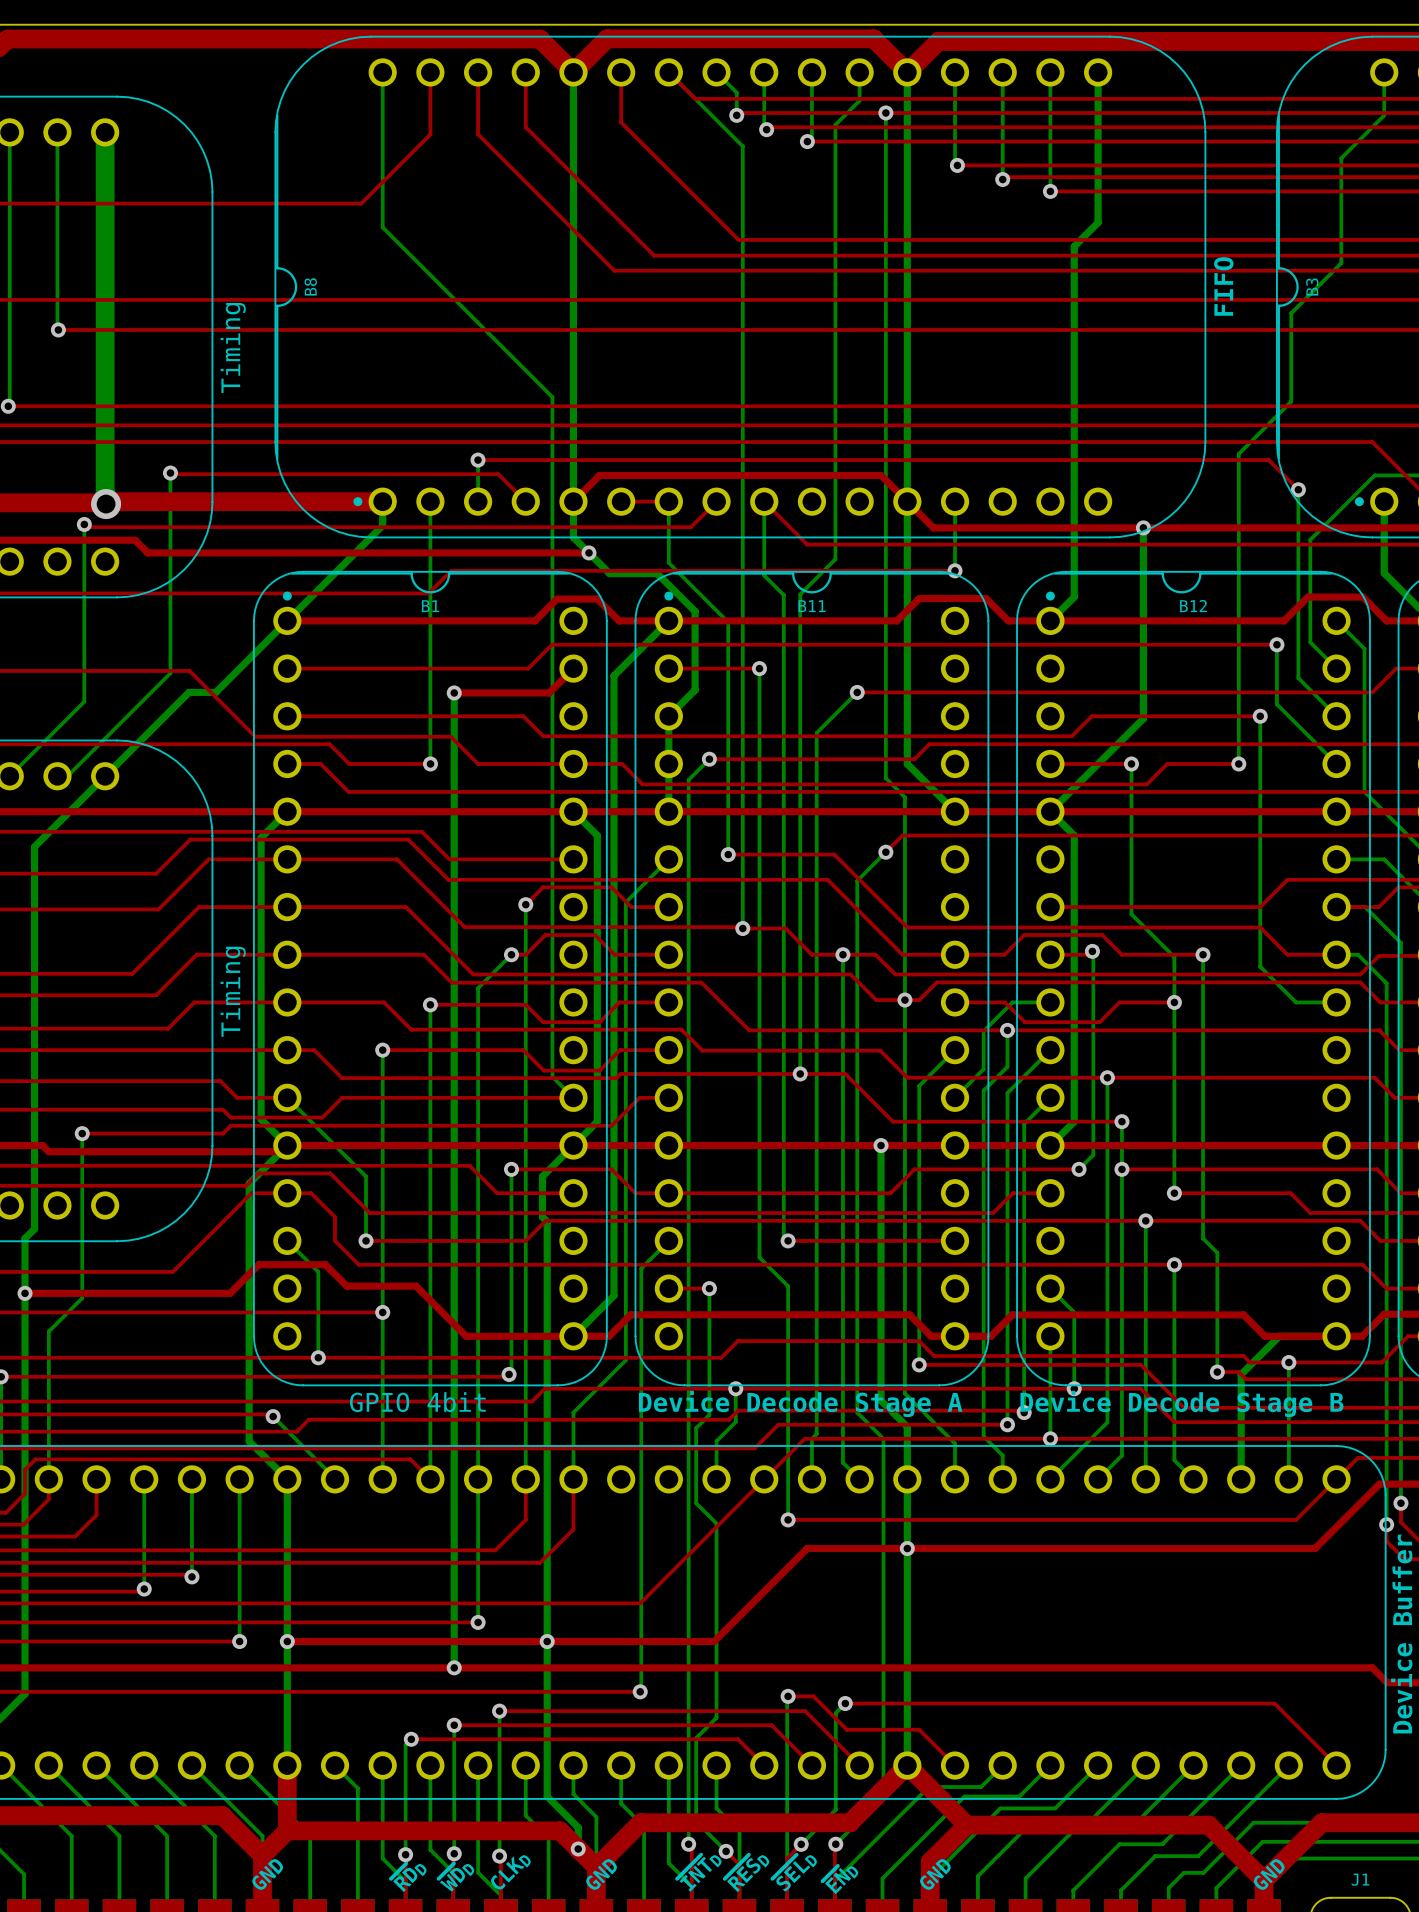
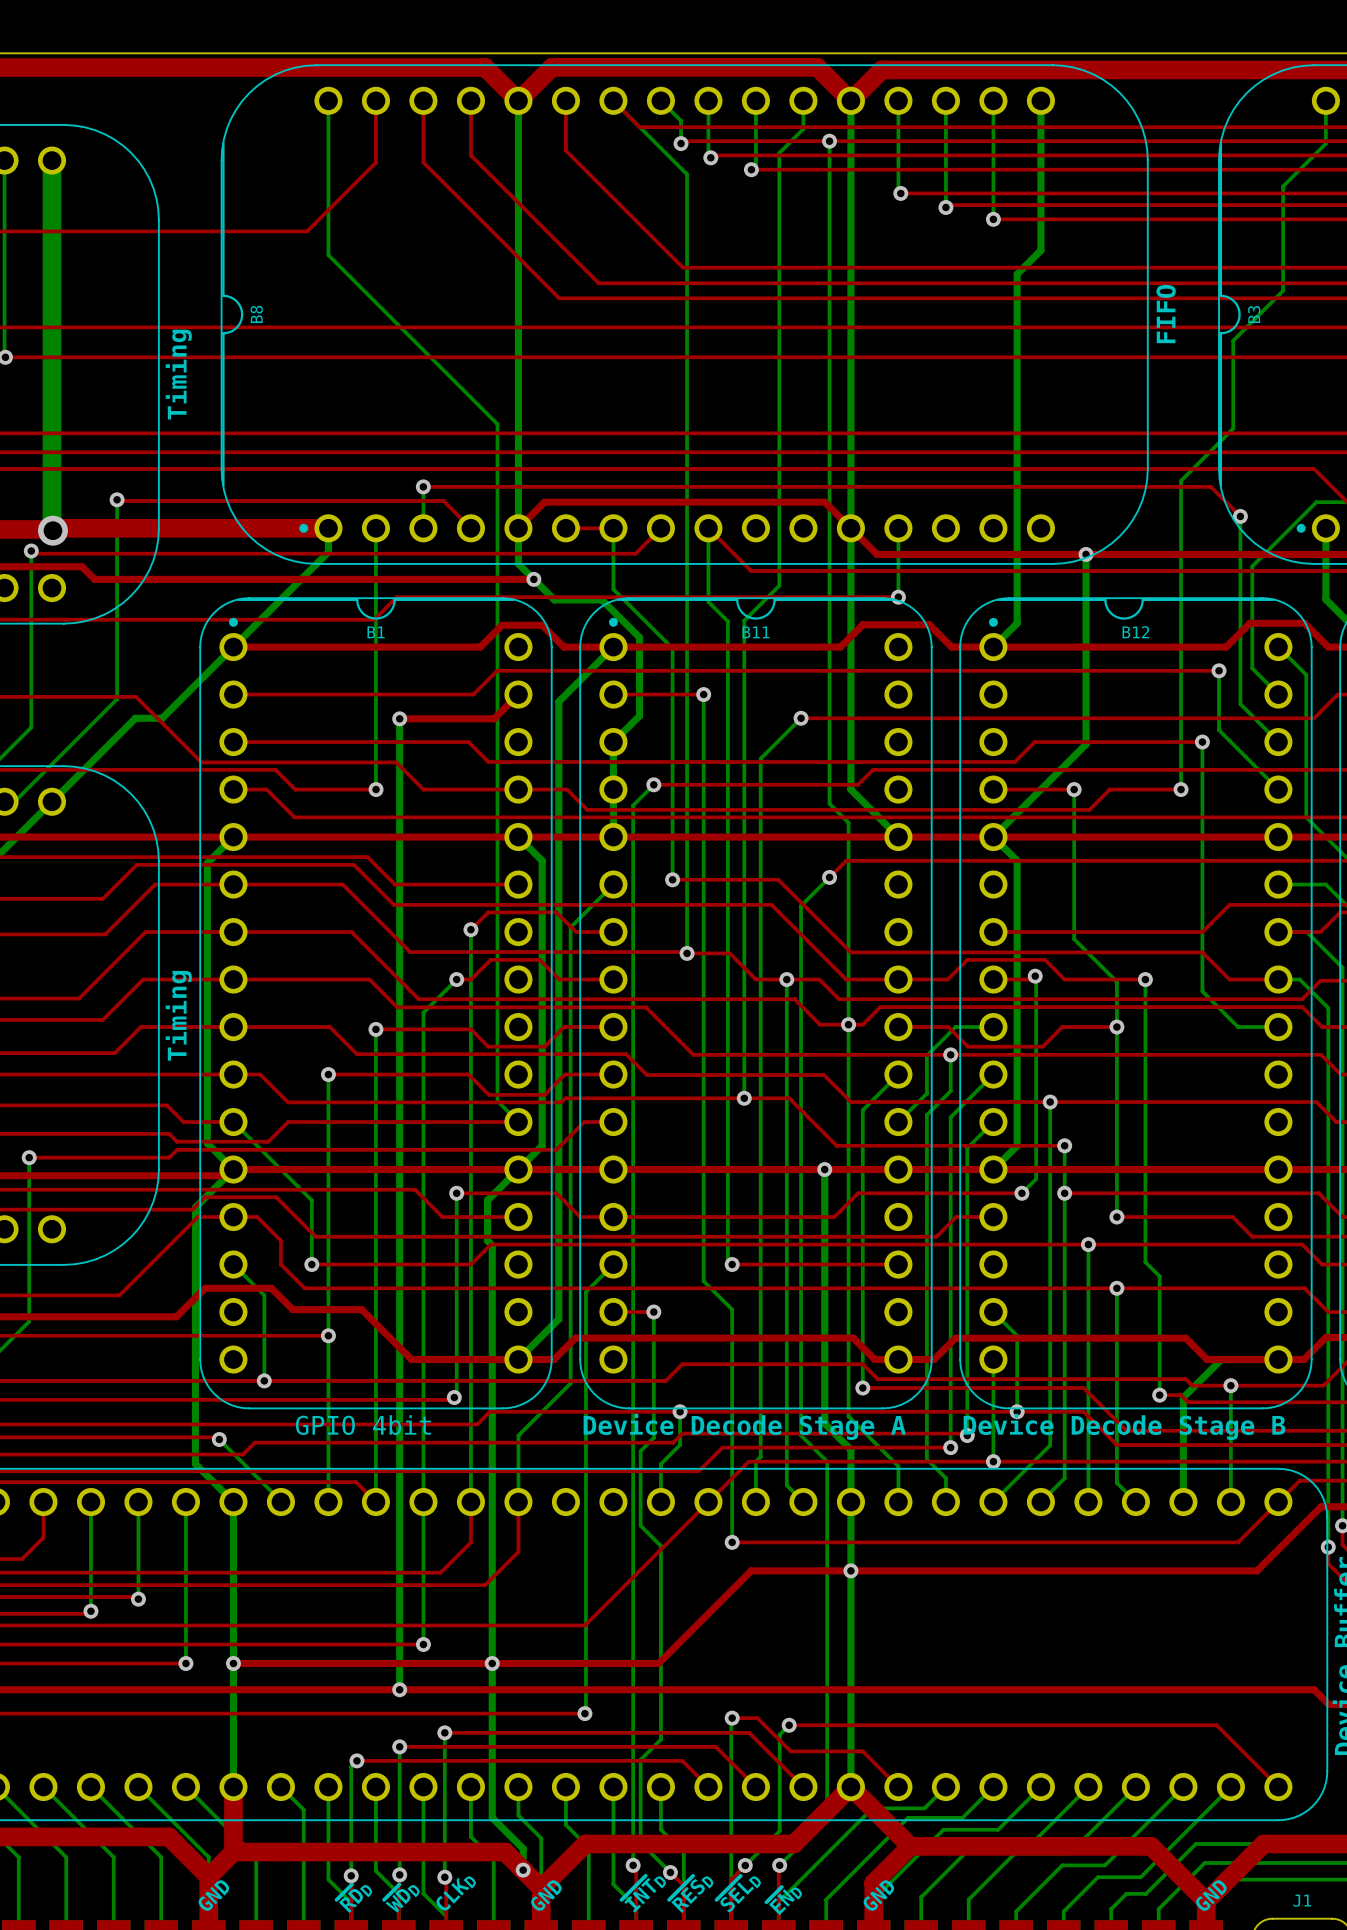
part text: none -> Timing (178, 374)
part text: Timing (233, 347) -> none
part text: none -> Timing (178, 1015)
part text: Timing (233, 991) -> none

